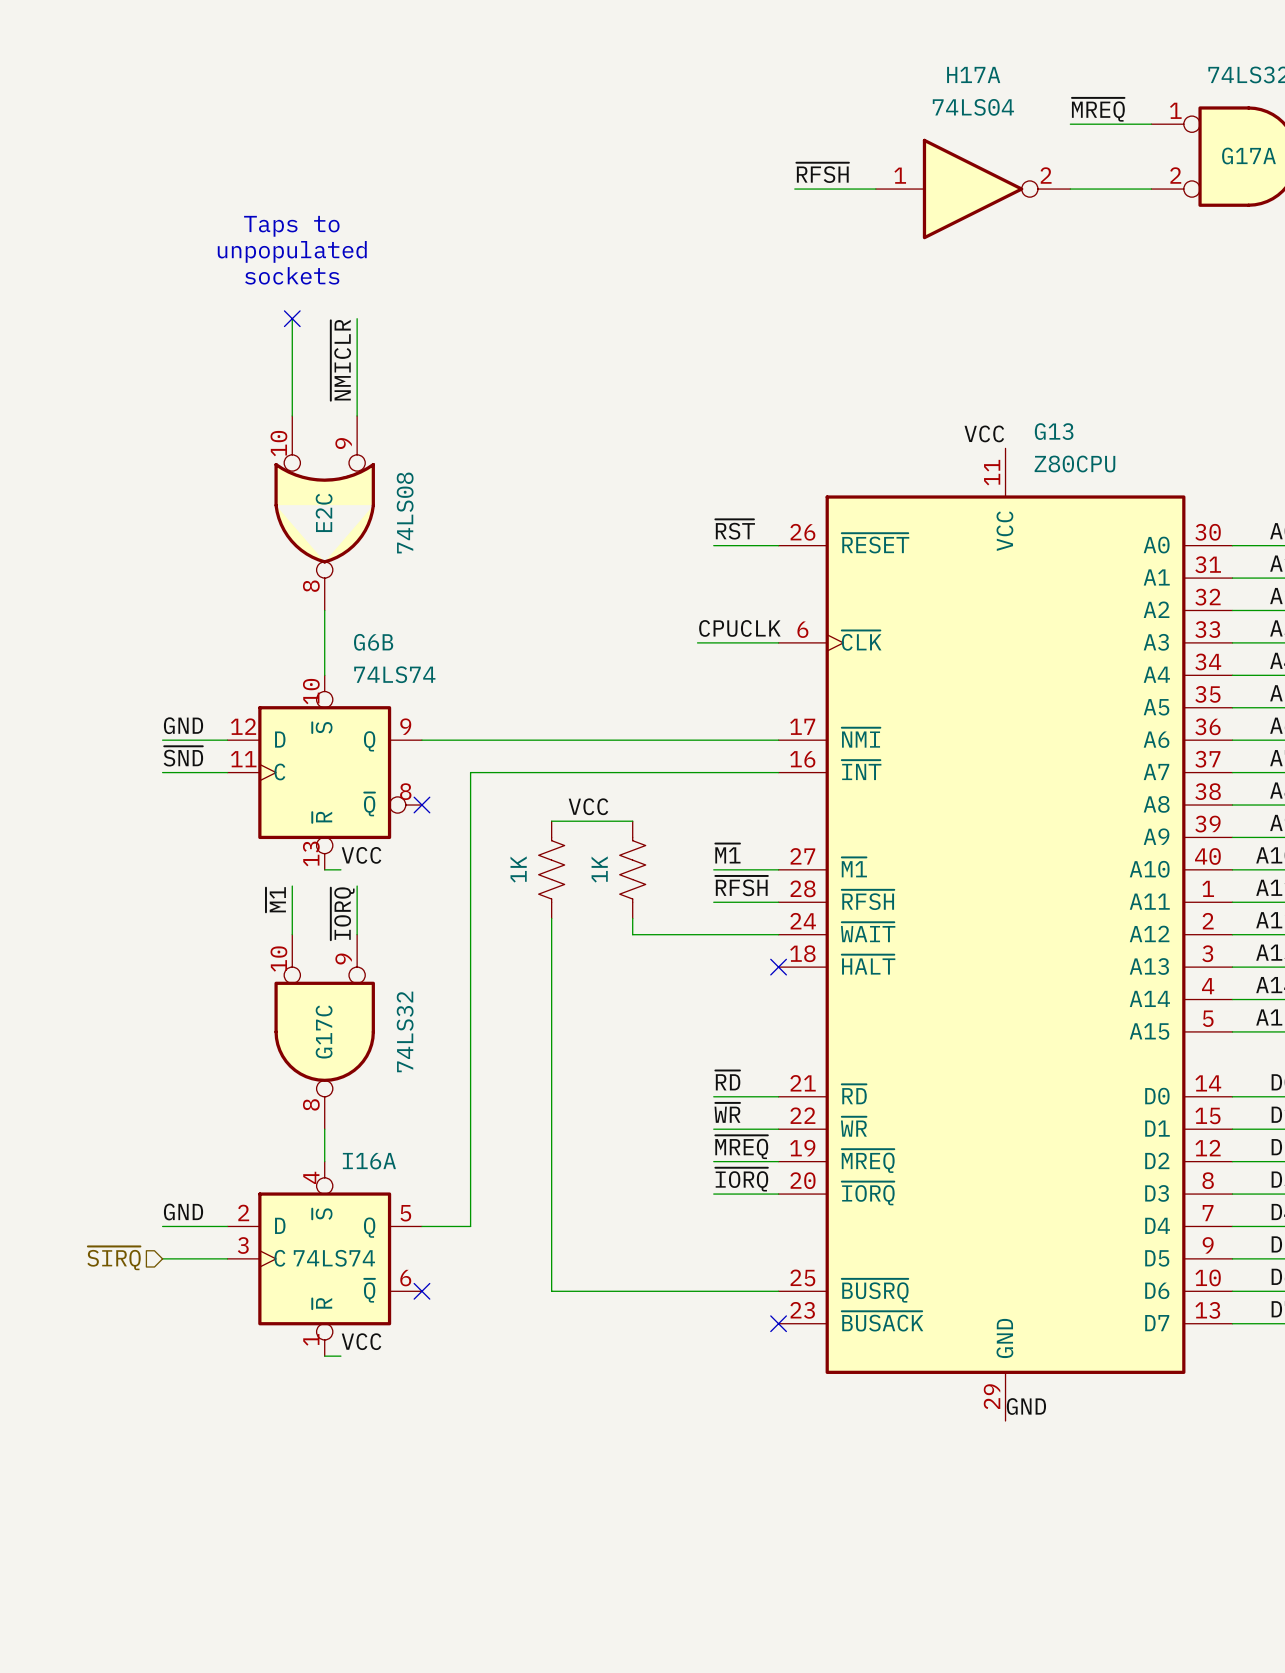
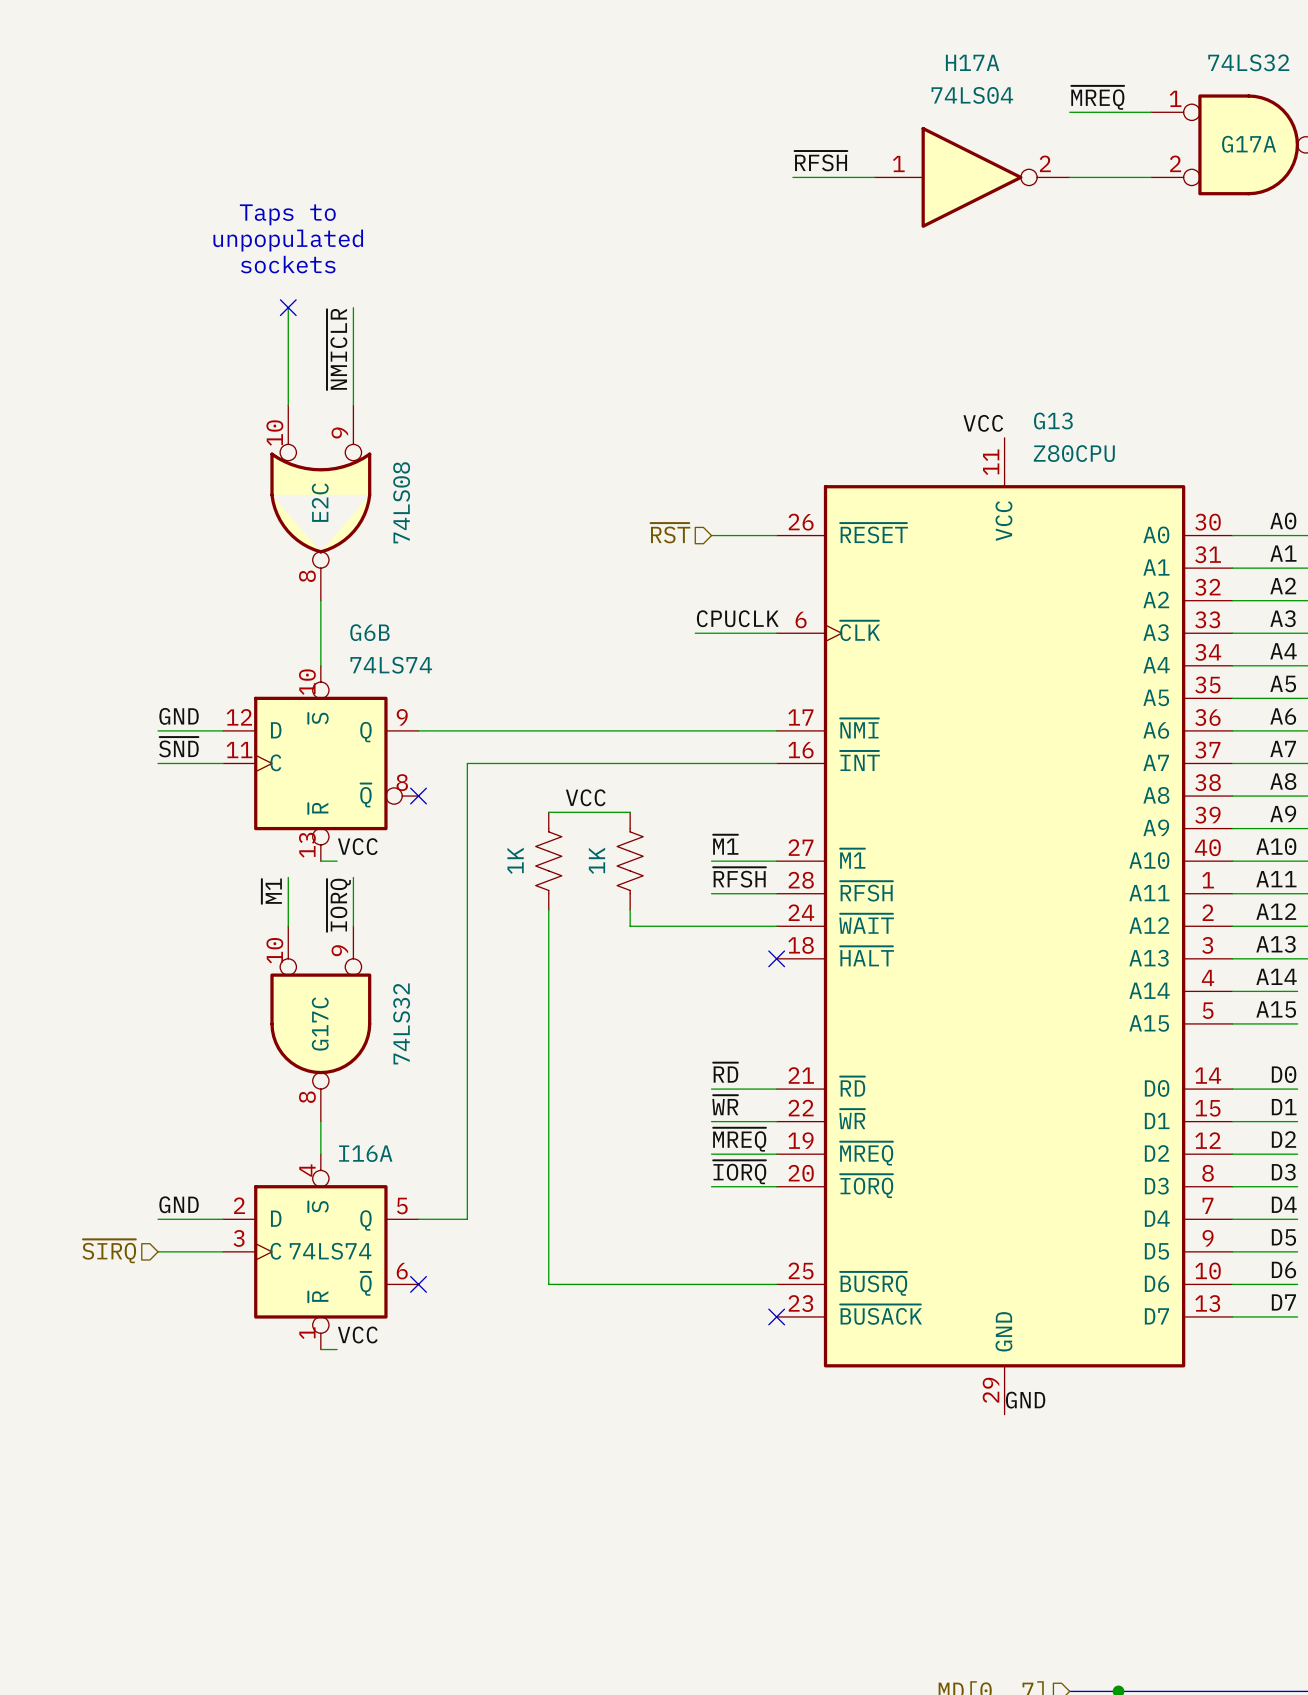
label: ~{RST} (735, 529) -> none
hierarchical label: none -> ~{RST} (670, 533)

